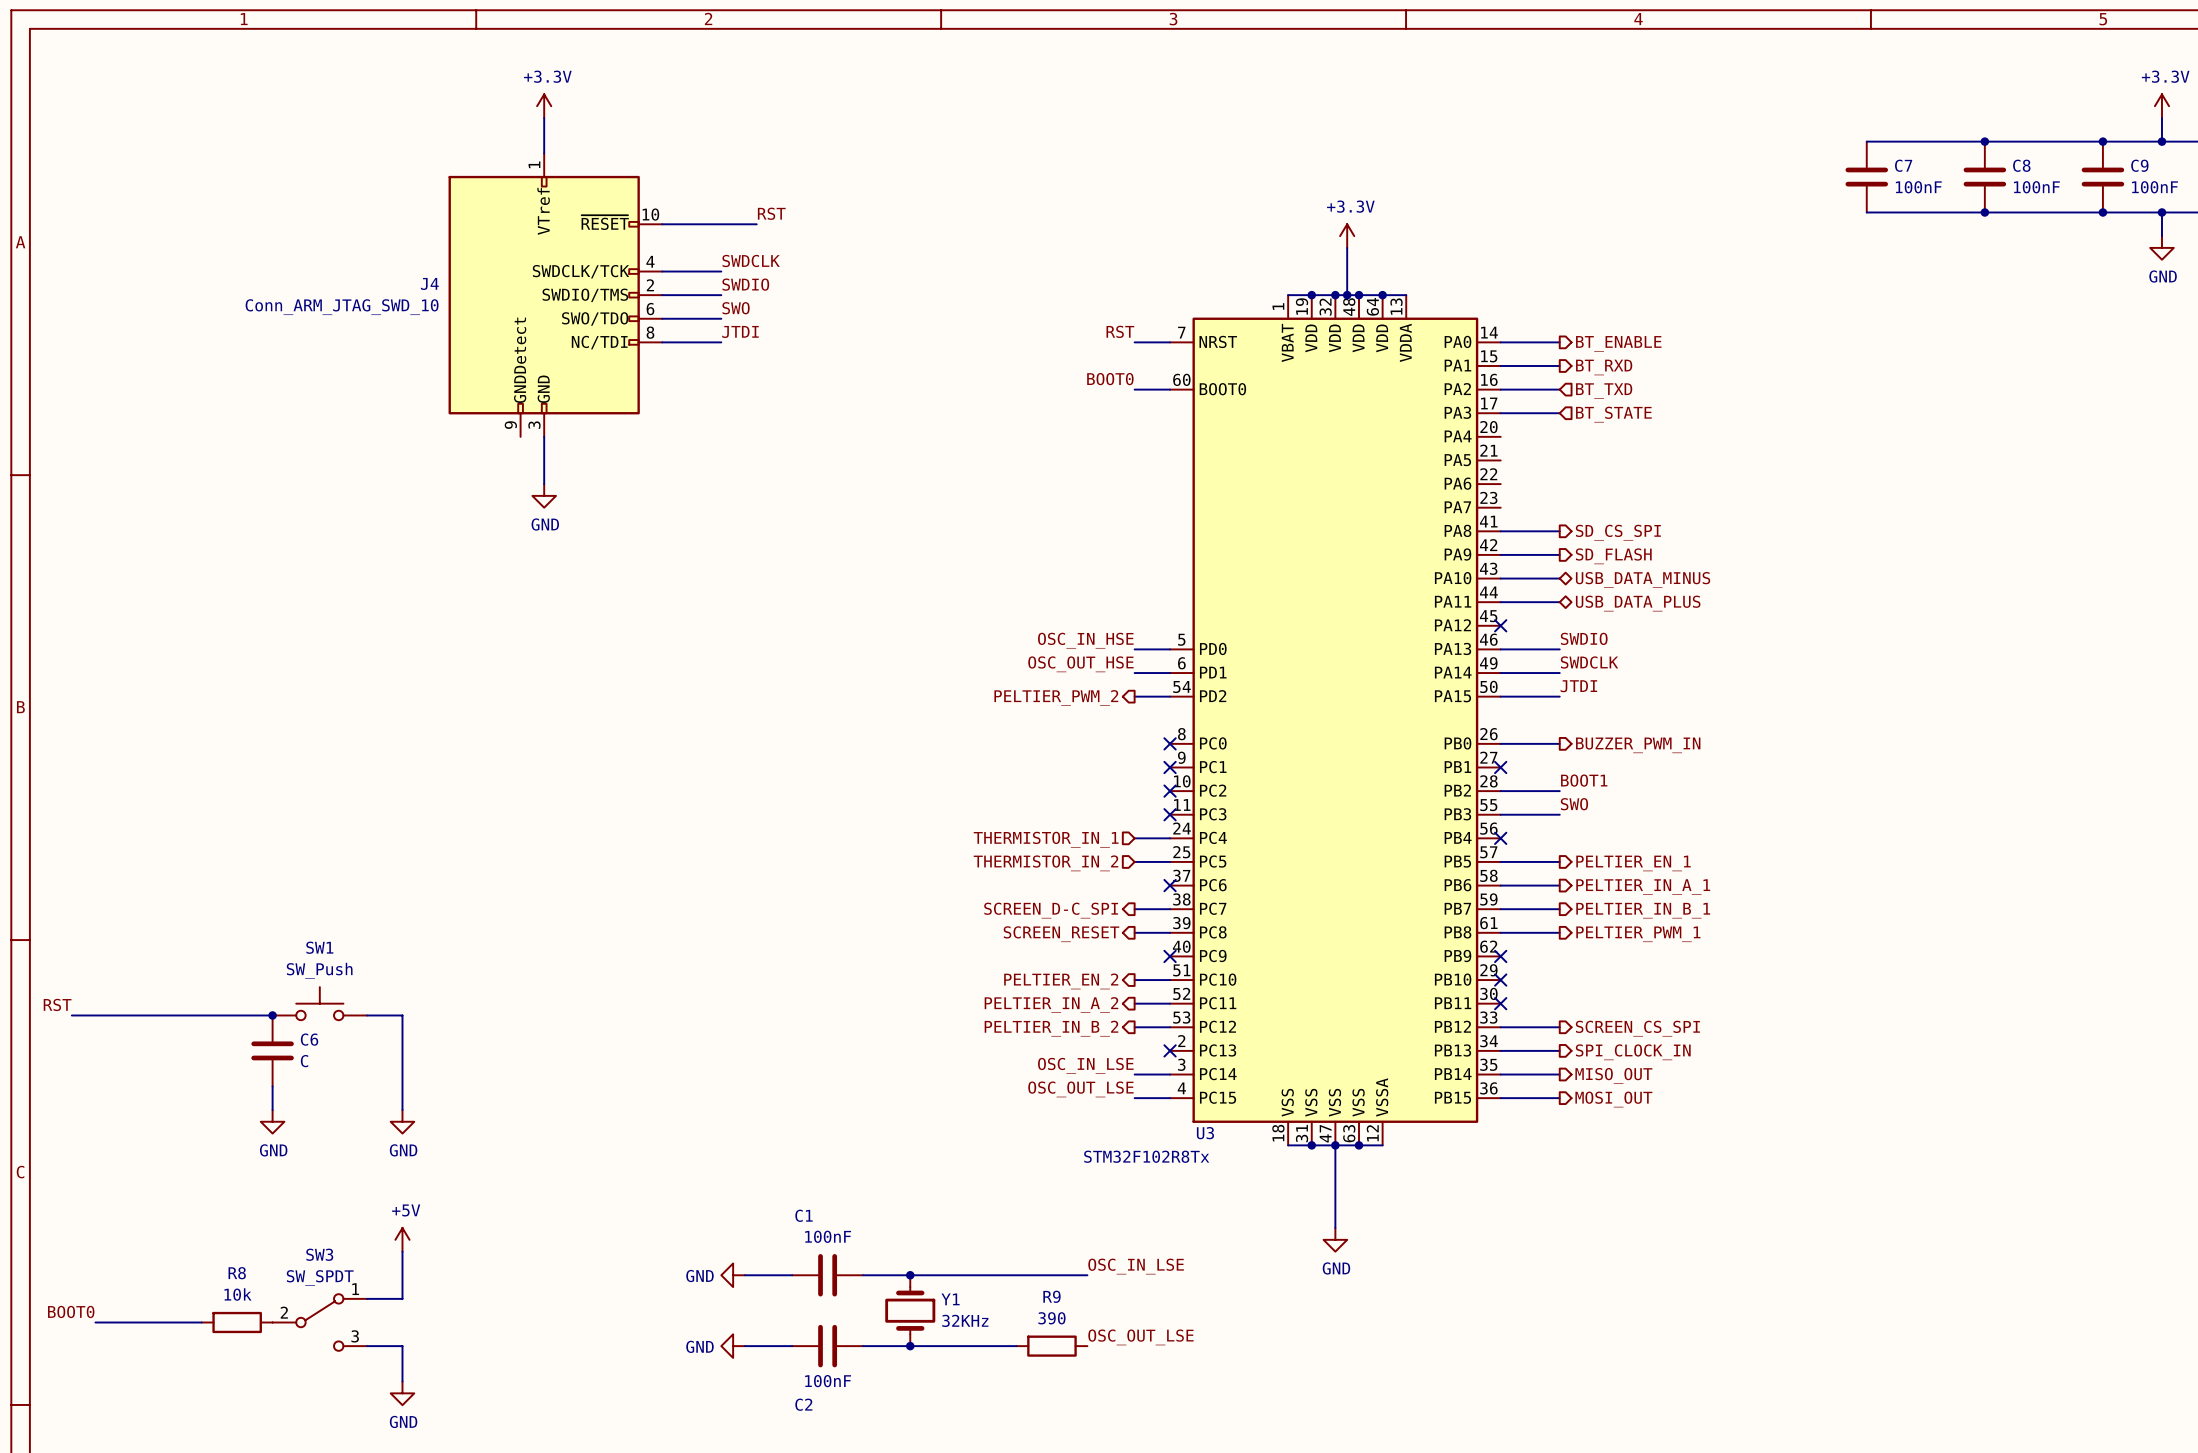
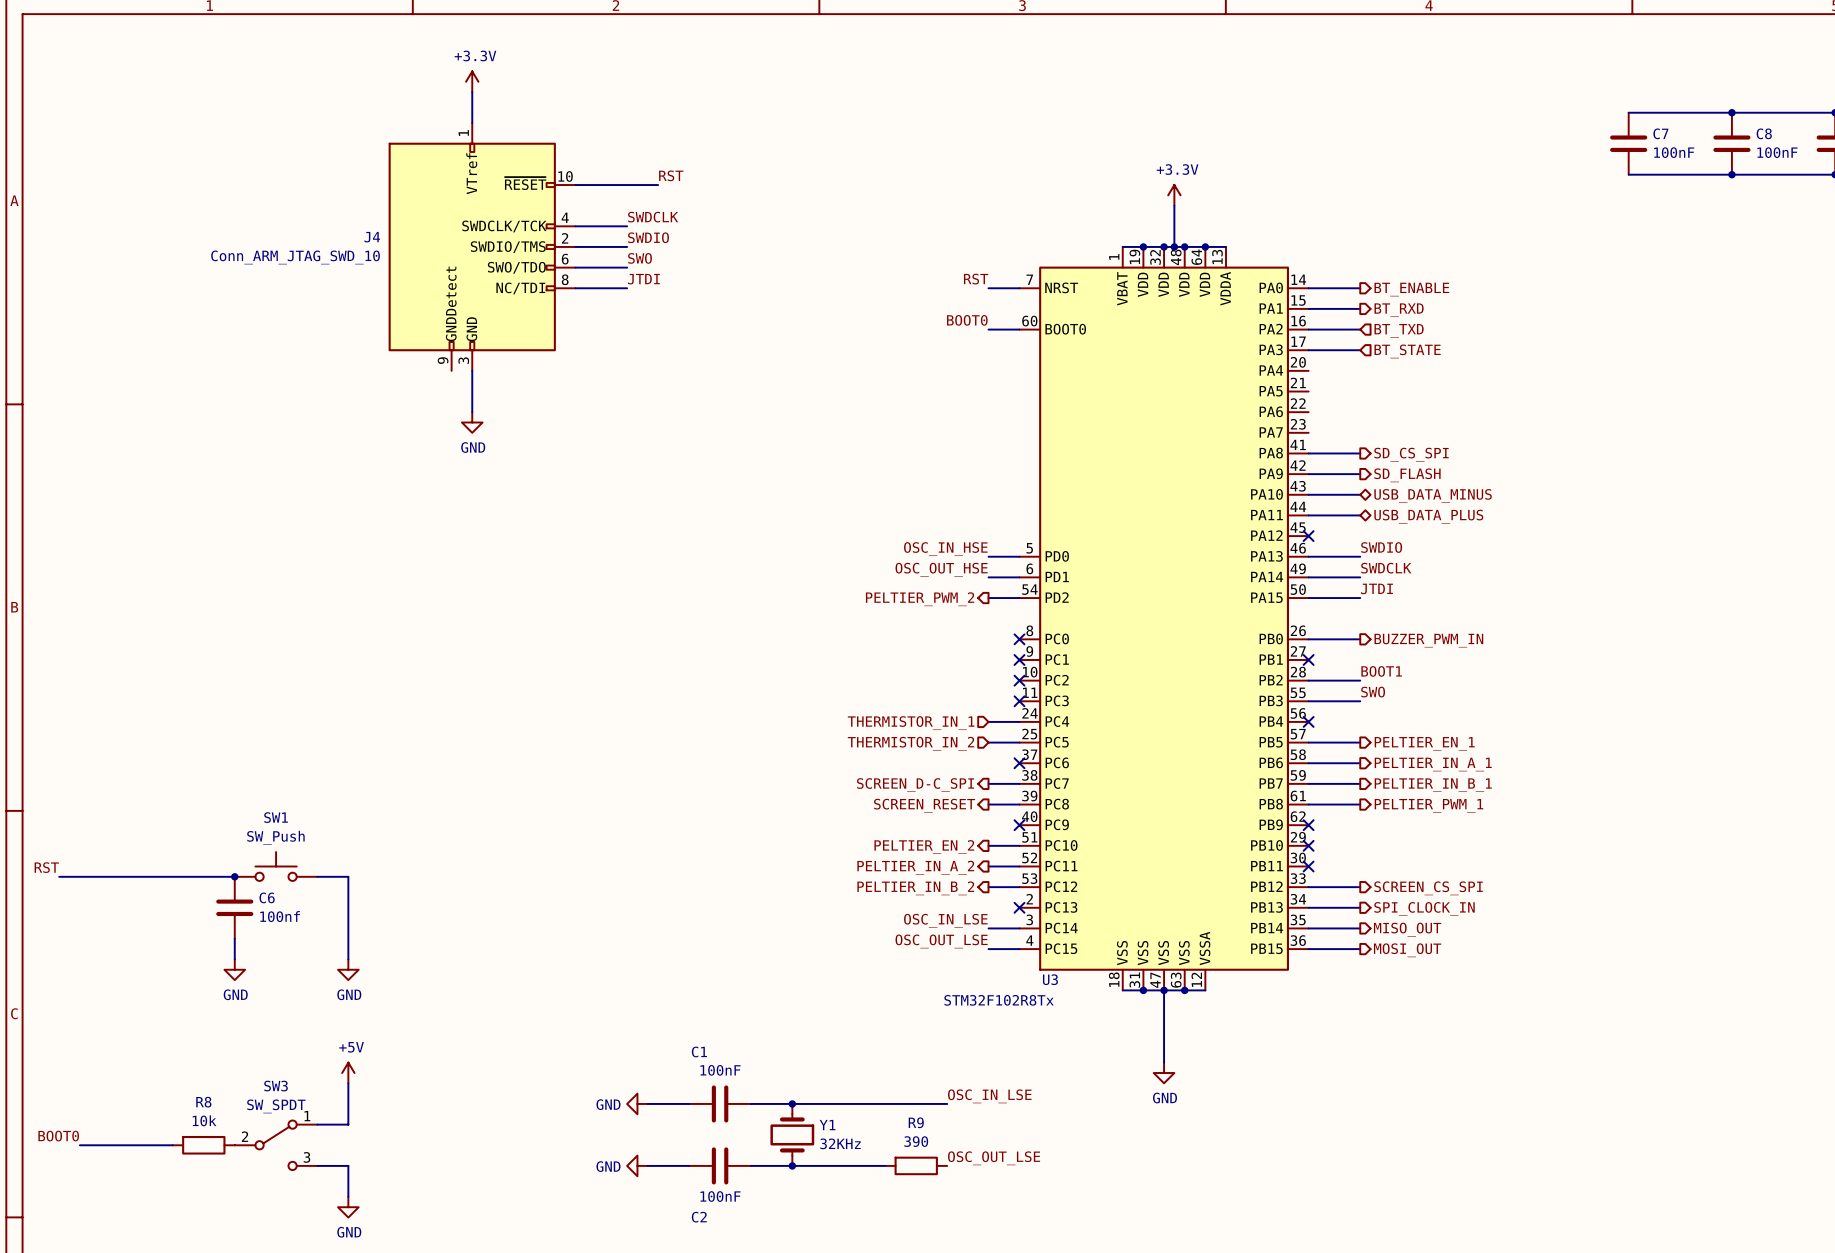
C6 value: C (304, 1061) -> 100nf (280, 916)

